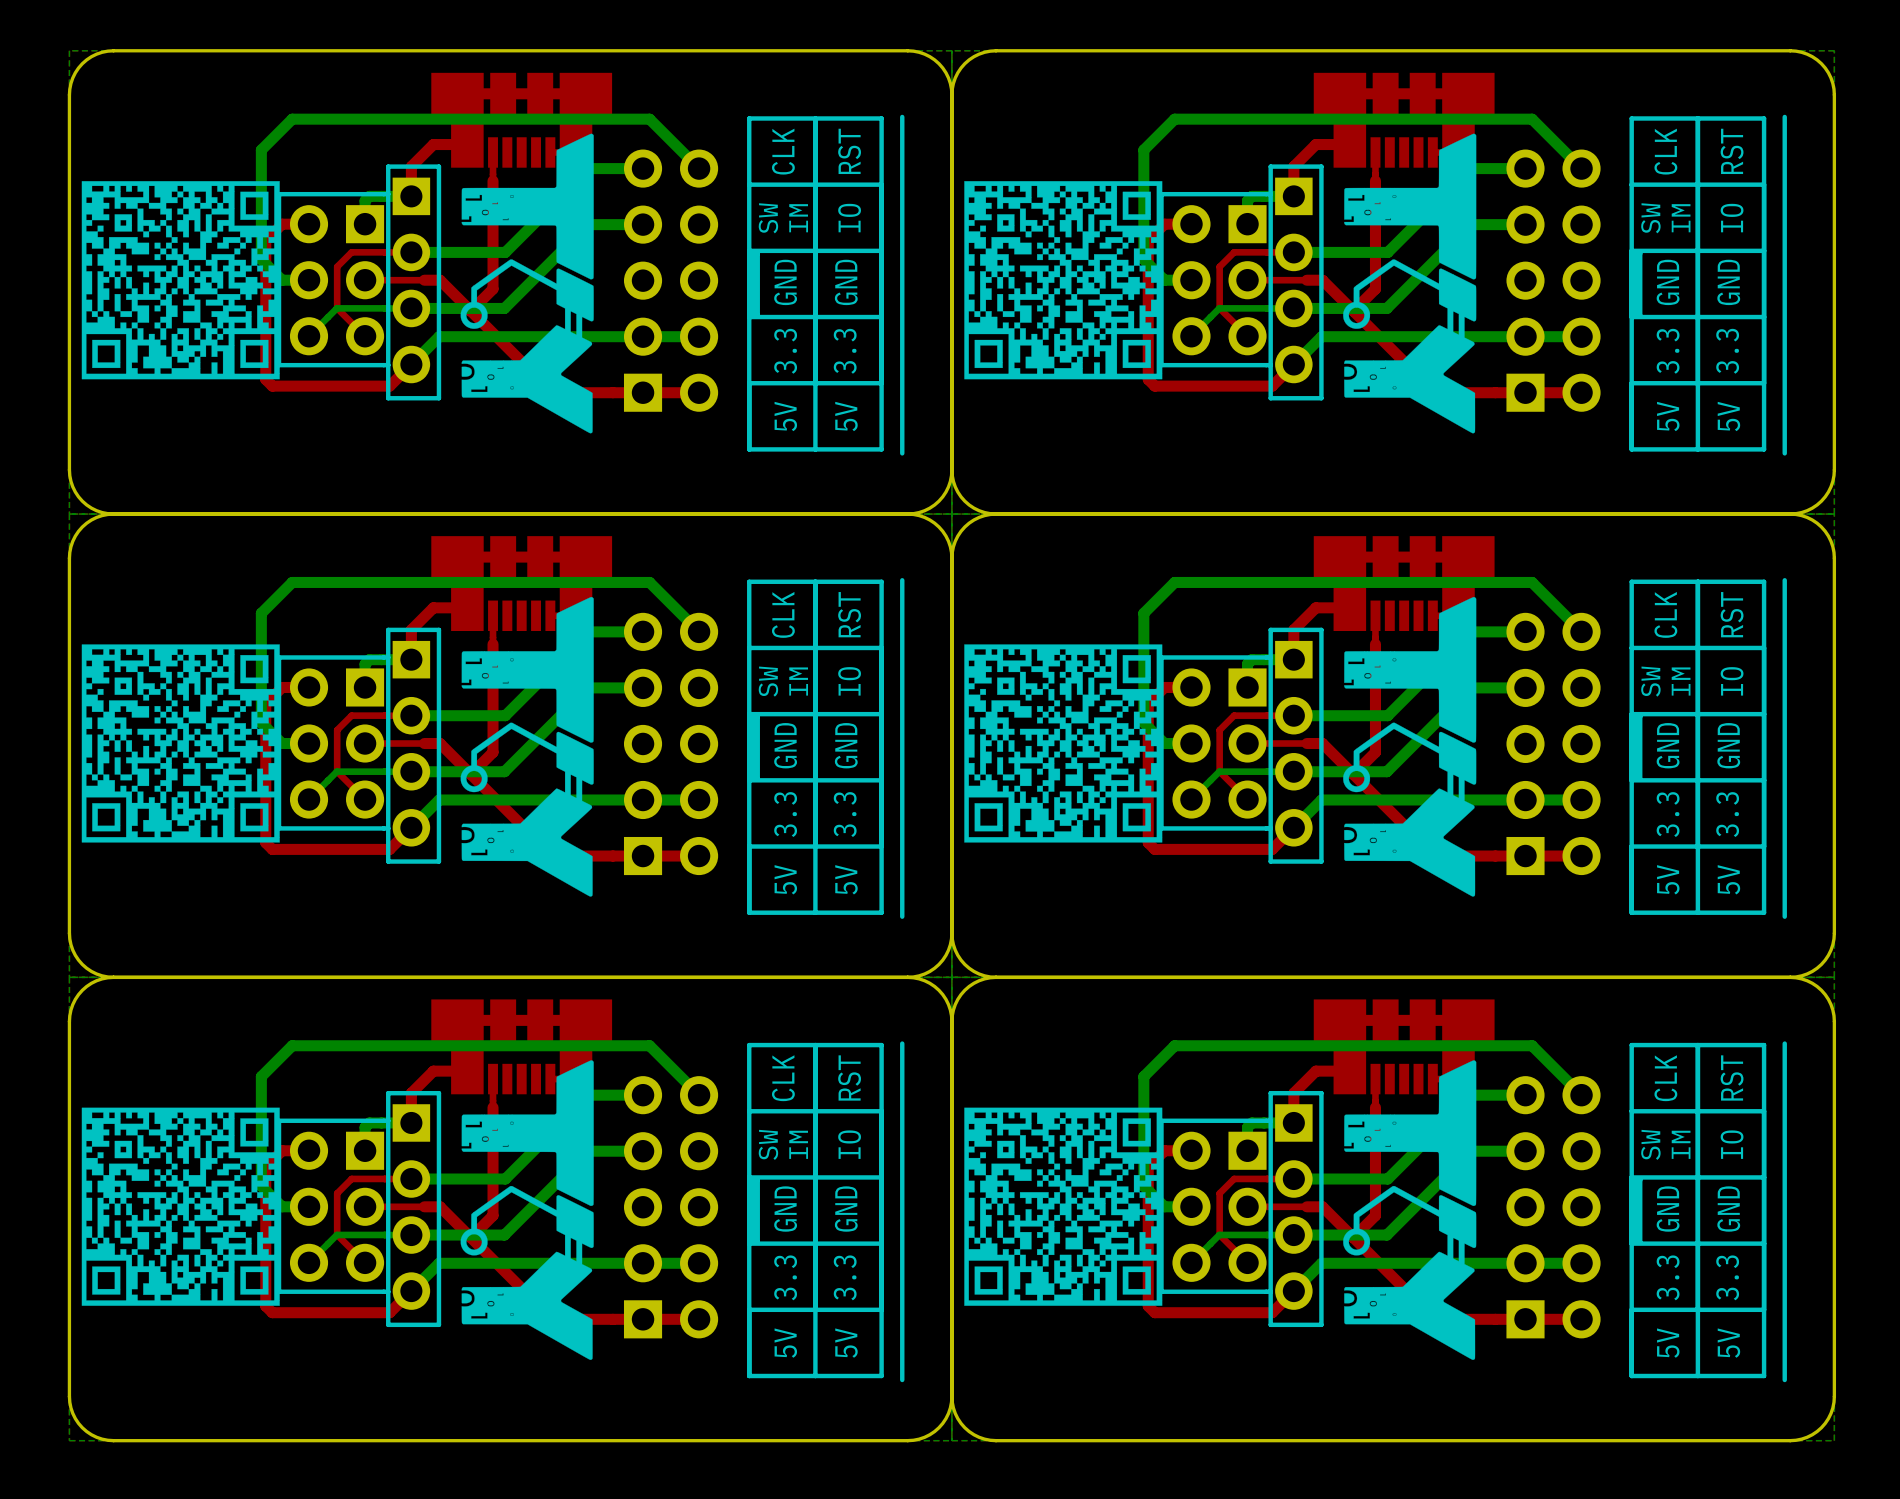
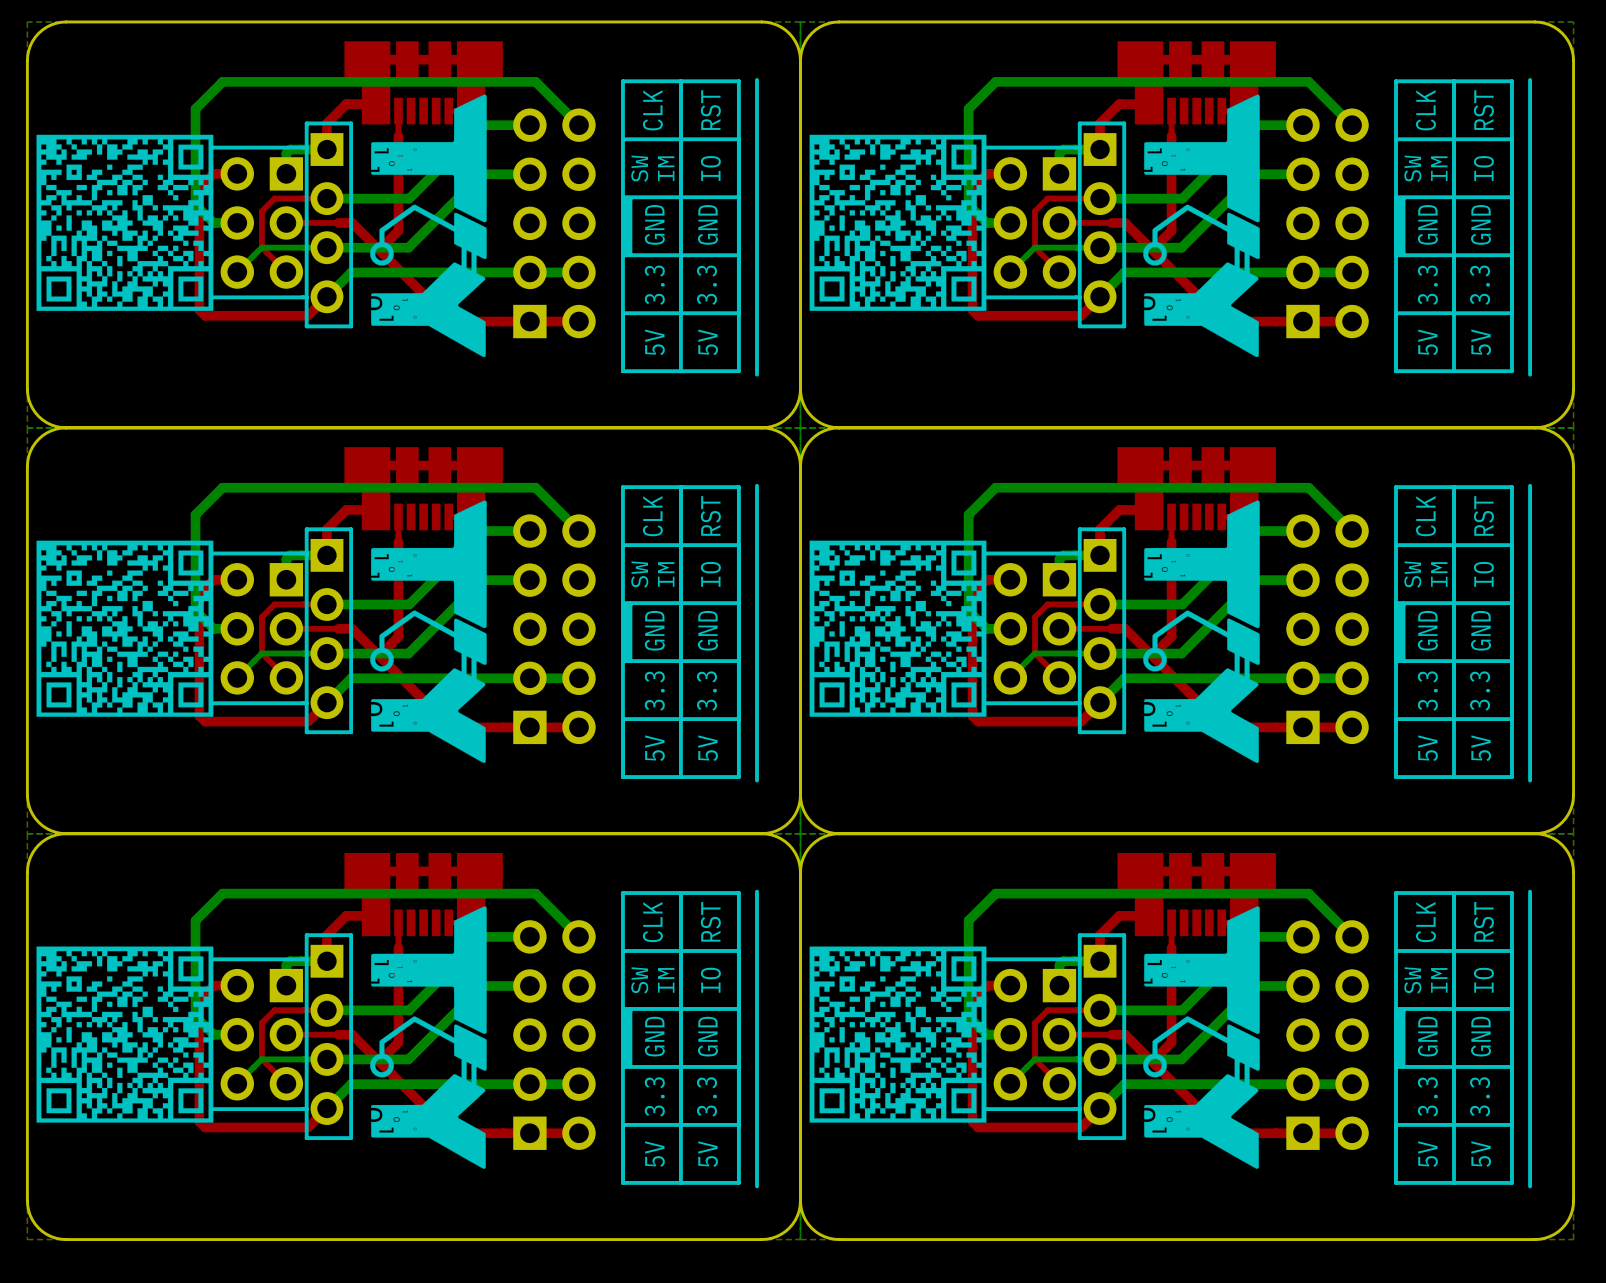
drawing shape: [81, 181, 280, 380] -> [36, 134, 214, 311]
drawing shape: [964, 181, 1163, 380] -> [809, 134, 987, 311]
drawing shape: [81, 644, 280, 843] -> [36, 540, 214, 717]
drawing shape: [964, 644, 1163, 843] -> [809, 540, 987, 717]
drawing shape: [81, 1107, 280, 1306] -> [36, 946, 214, 1123]
drawing shape: [964, 1107, 1163, 1306] -> [809, 946, 987, 1123]

